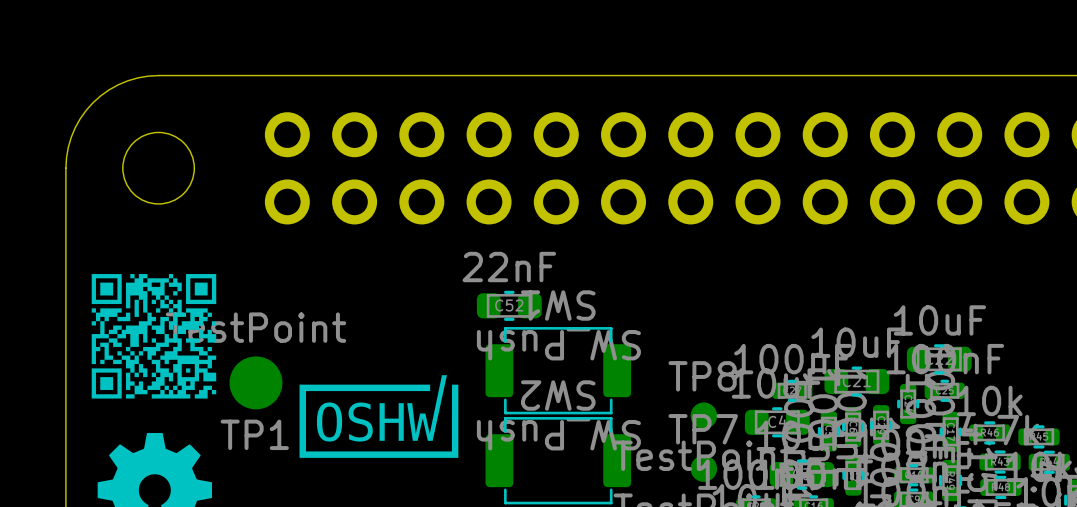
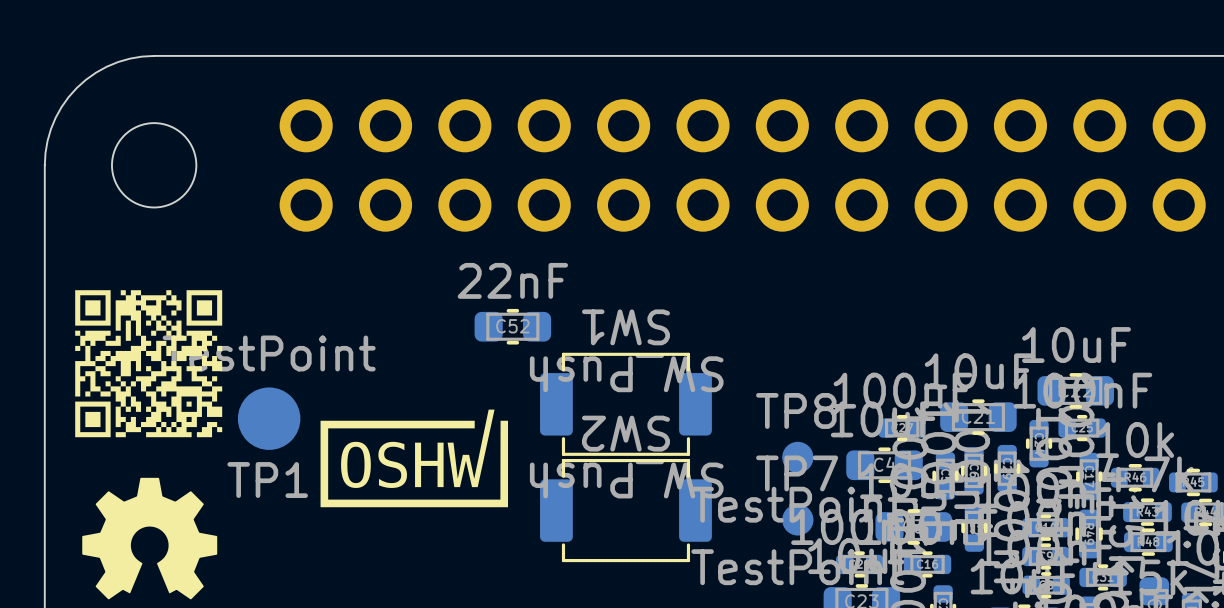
C52 position: (509, 305) -> (512, 326)

